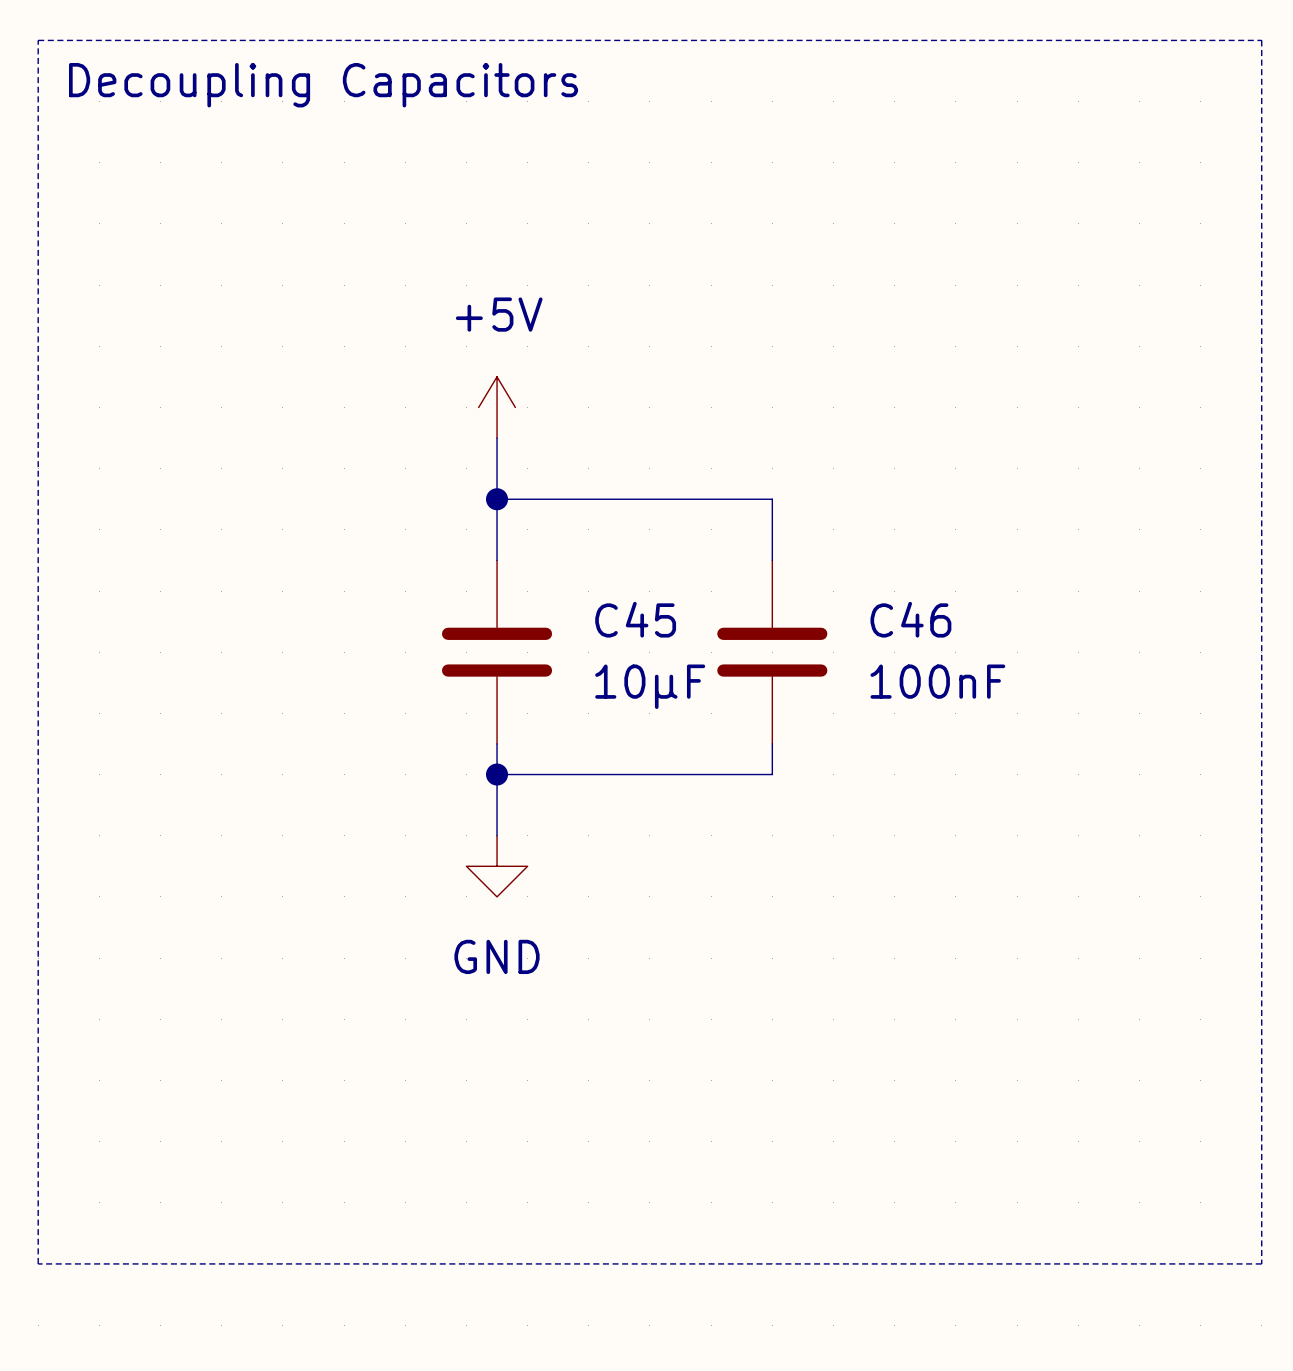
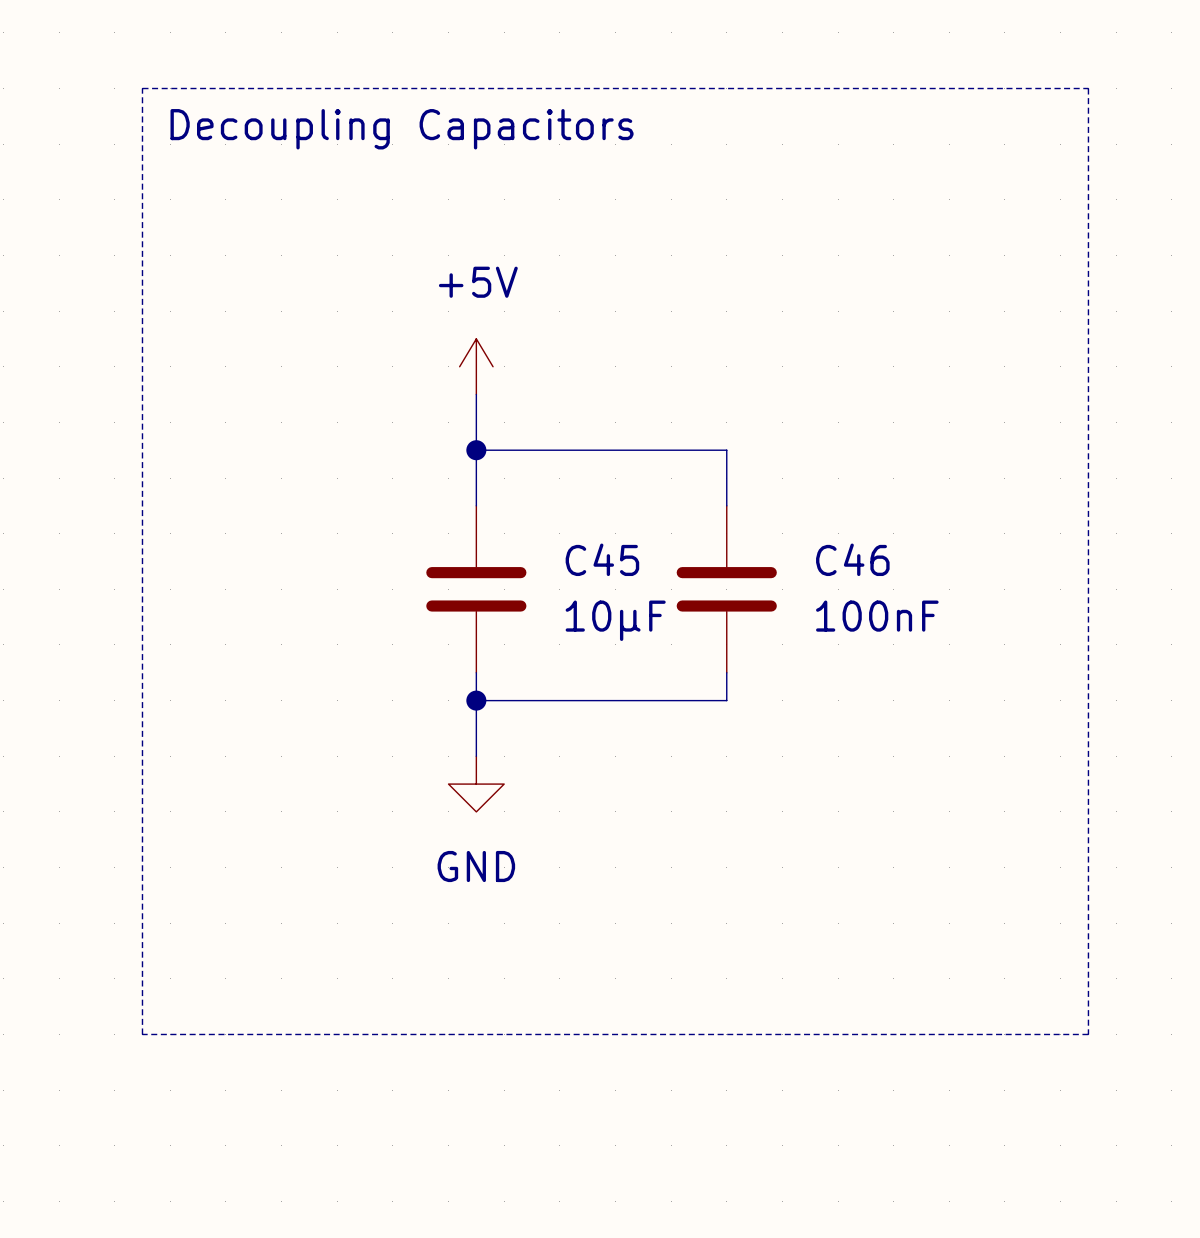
line: (38, 40) (1261, 40) (1261, 1263) (38, 1263) (38, 40) -> (142, 88) (142, 1034) (1088, 1034) (1088, 88) (142, 88)
text position: Decoupling Capacitors (323, 85) -> Decoupling Capacitors (402, 129)

